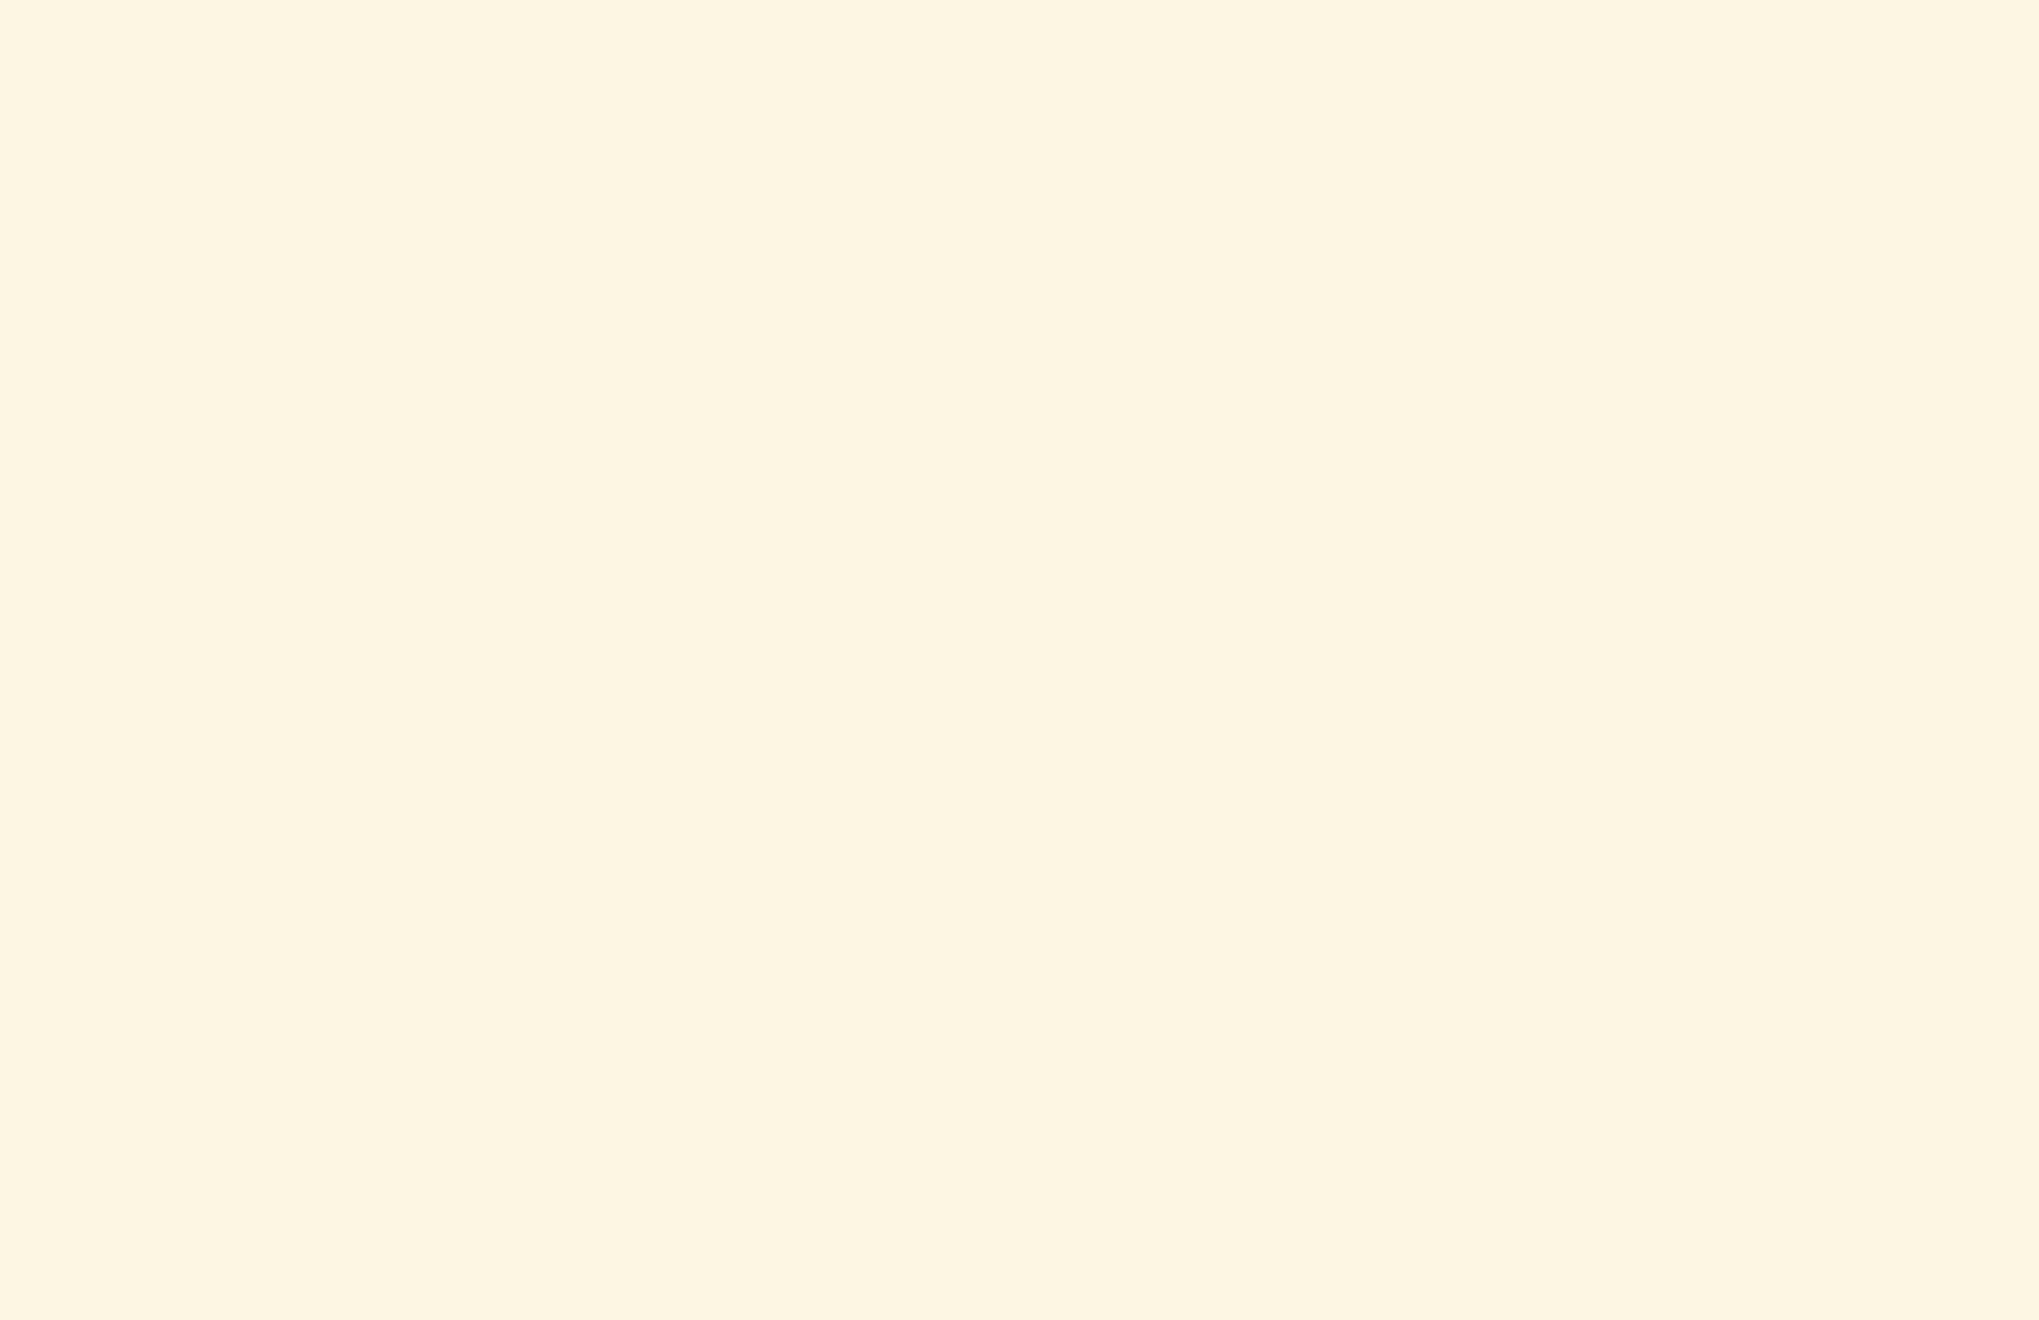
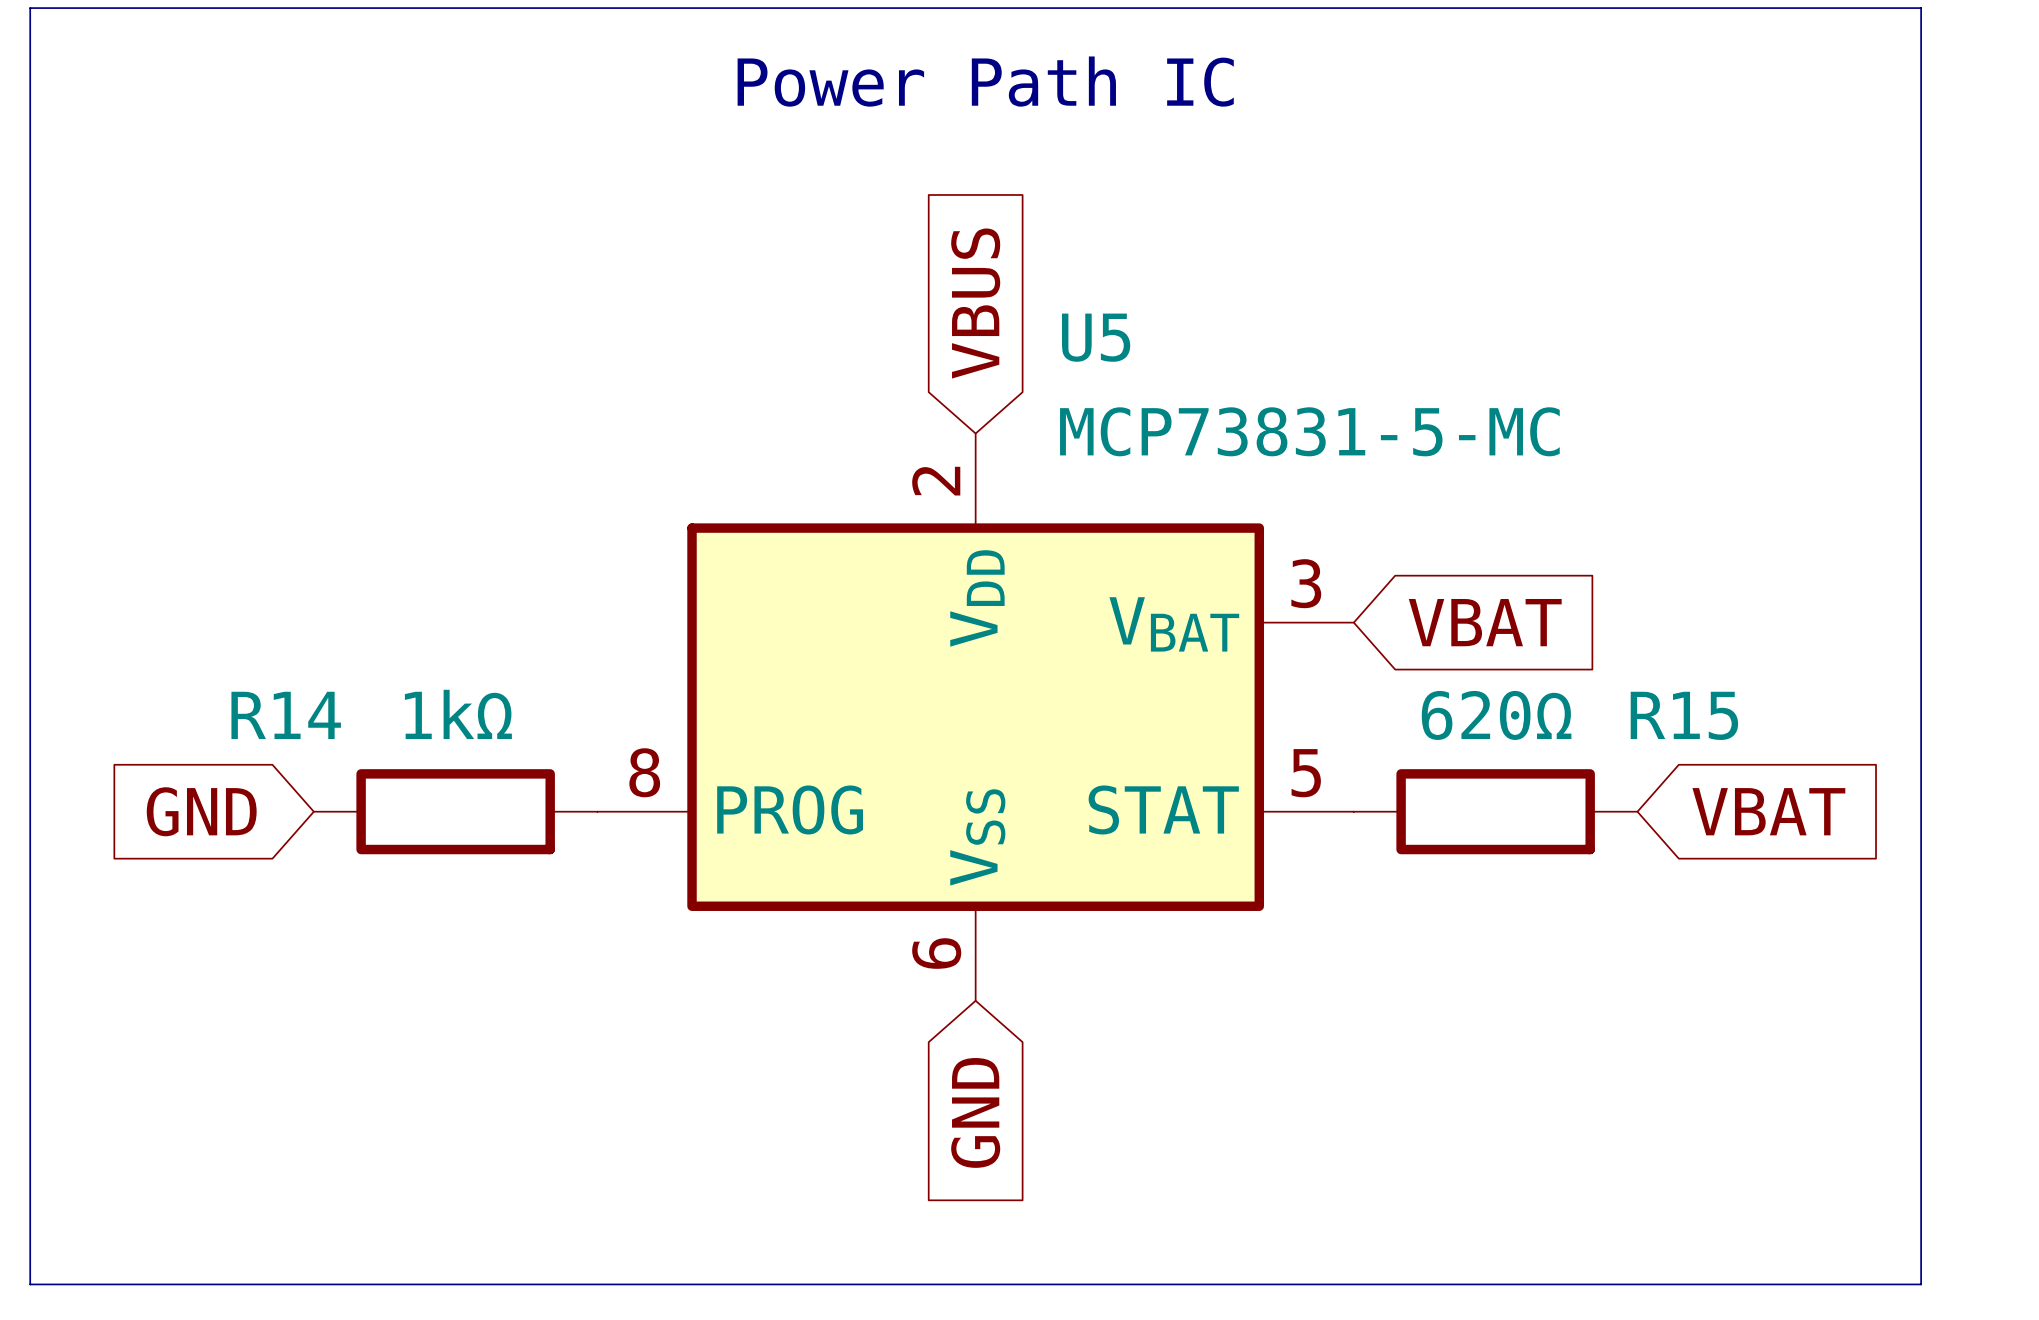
line: none -> (30, 8) (1921, 8) (1921, 1284) (30, 1284) (30, 8)
text: none -> Power Path IC (985, 81)
global label: none -> VBUS (975, 303)
global label: none -> VBAT (1485, 622)
U5: none -> MCP73831-5-MC (975, 717)
global label: none -> GND (201, 811)
R14: none -> 1kΩ (455, 811)
R15: none -> 620Ω (1495, 811)
global label: none -> VBAT (1768, 811)
global label: none -> GND (975, 1112)

